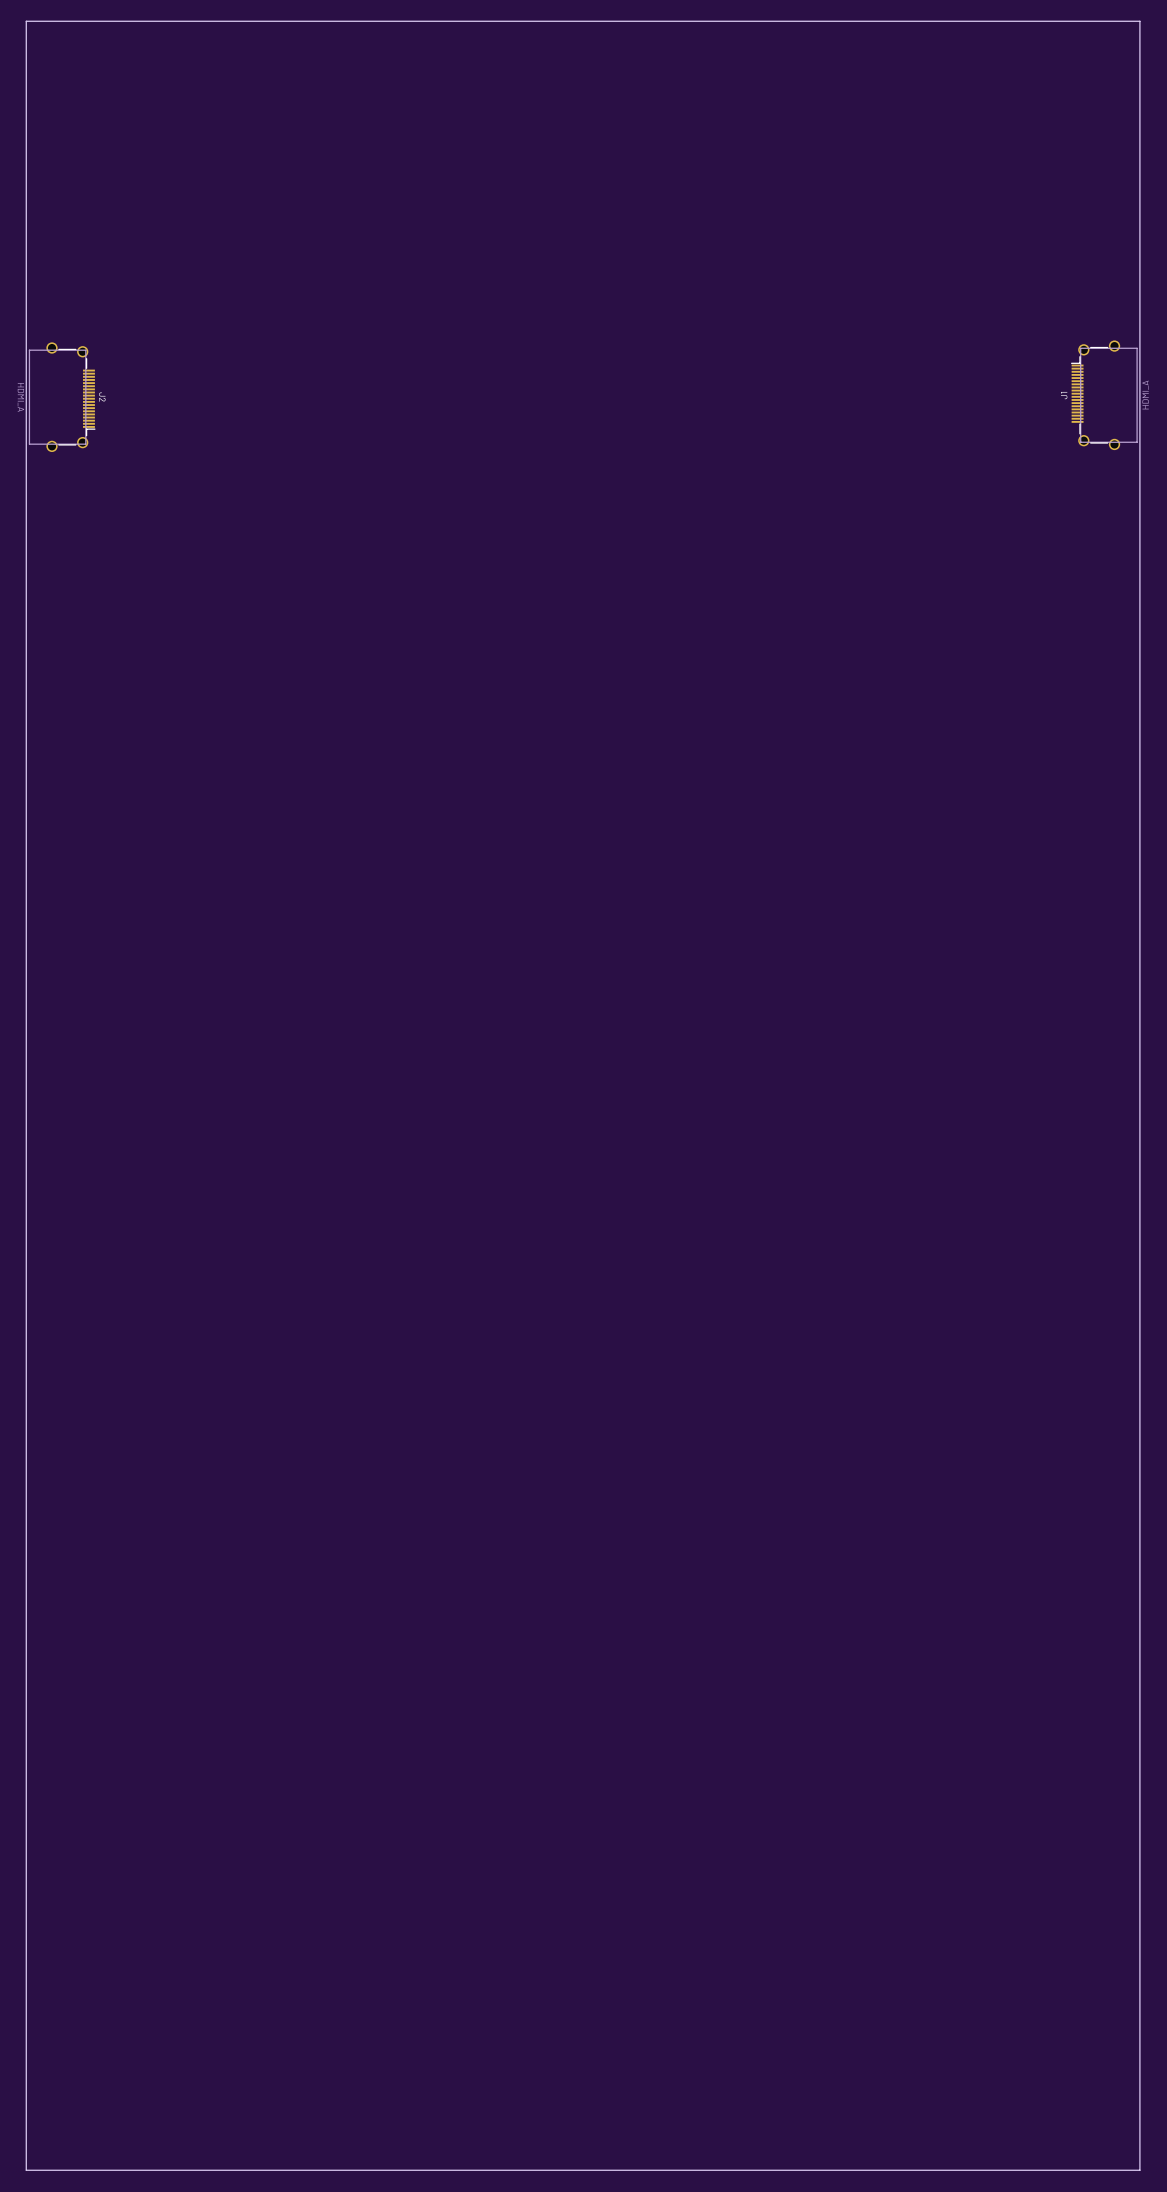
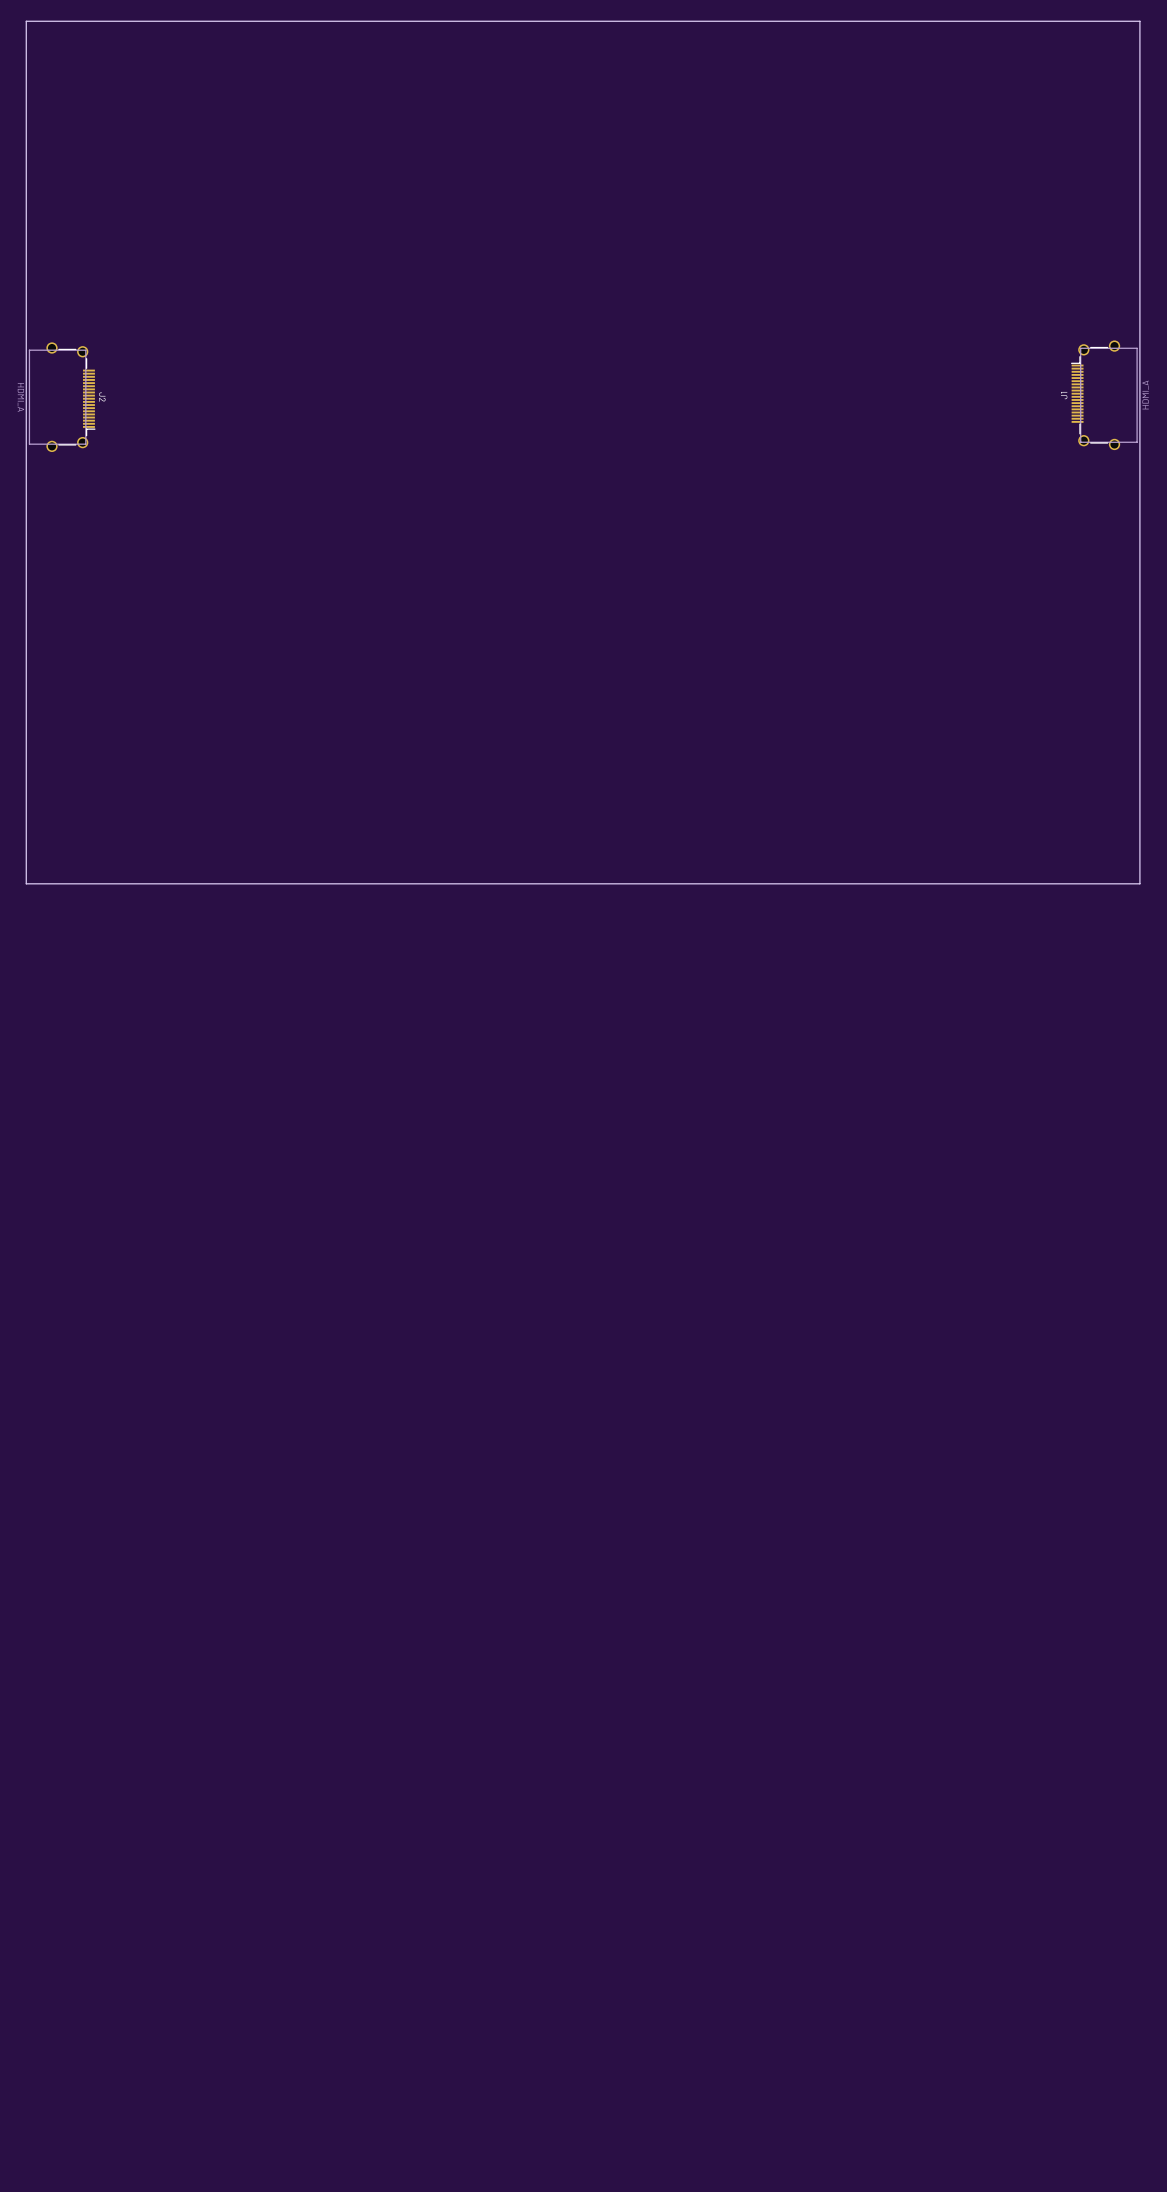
board edge: (26, 883) (26, 2170) (1139, 2170) (1139, 883) -> (26, 883) (1139, 883)

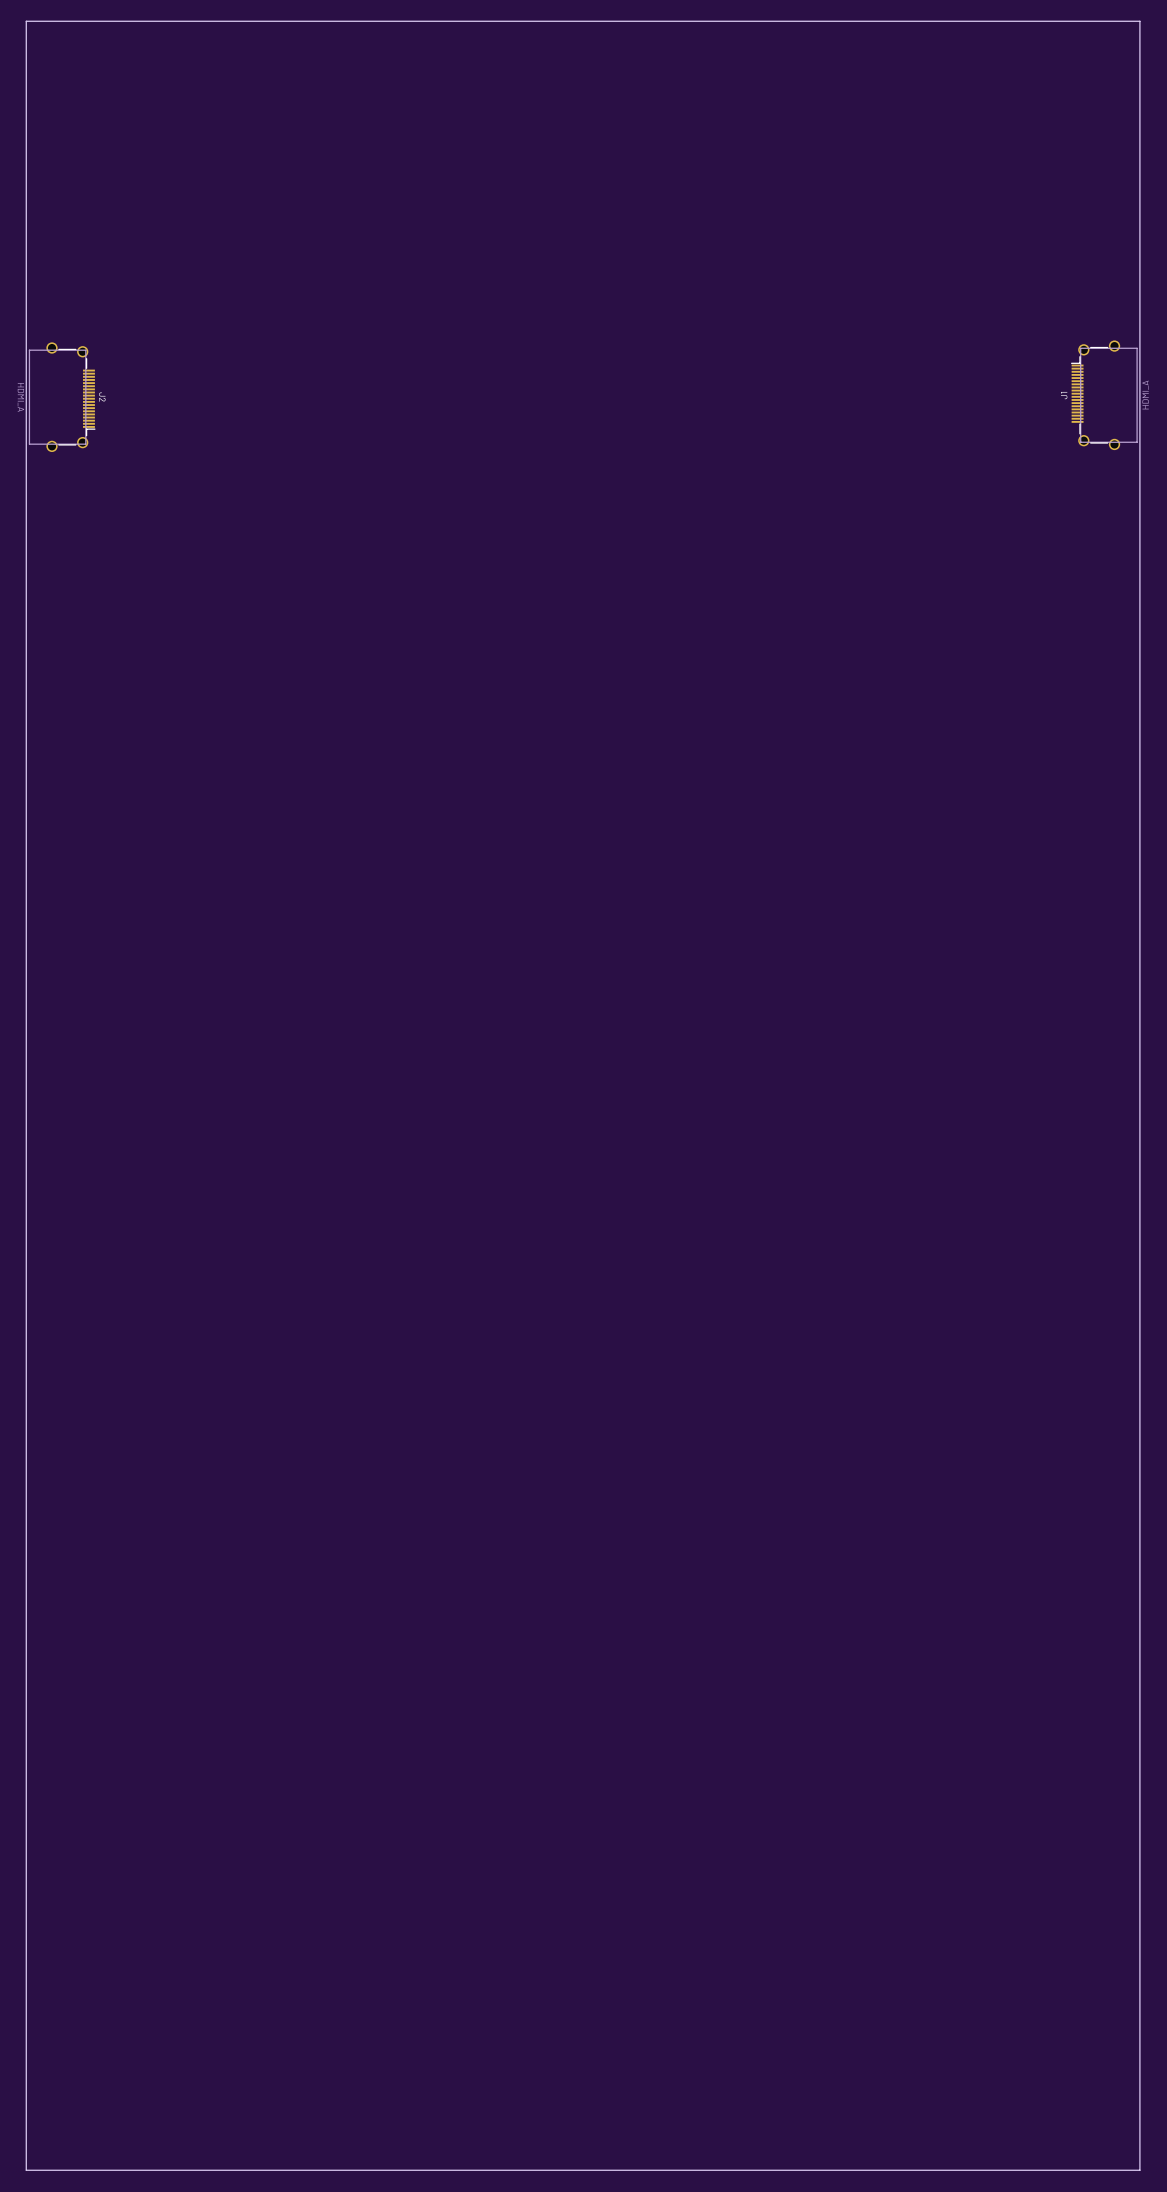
board edge: (26, 883) (1139, 883) -> (26, 883) (26, 2170) (1139, 2170) (1139, 883)

